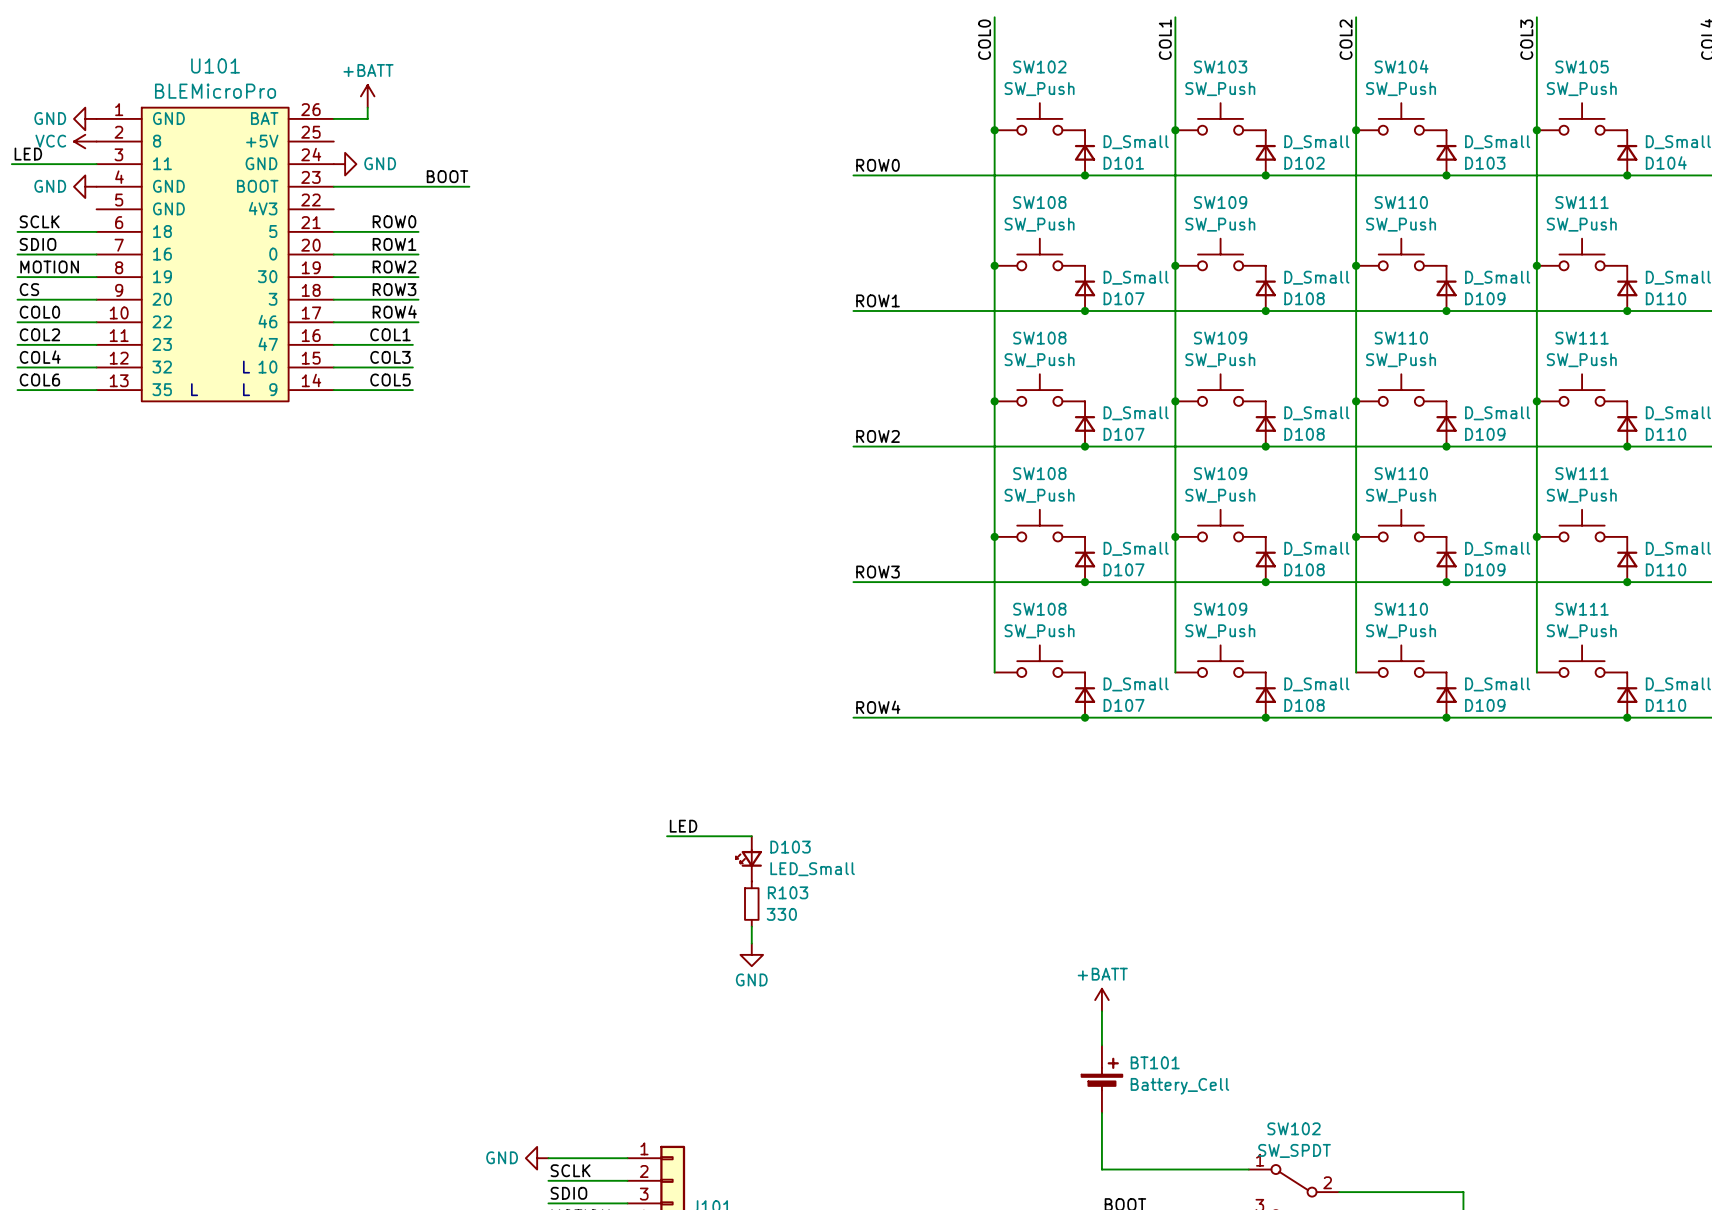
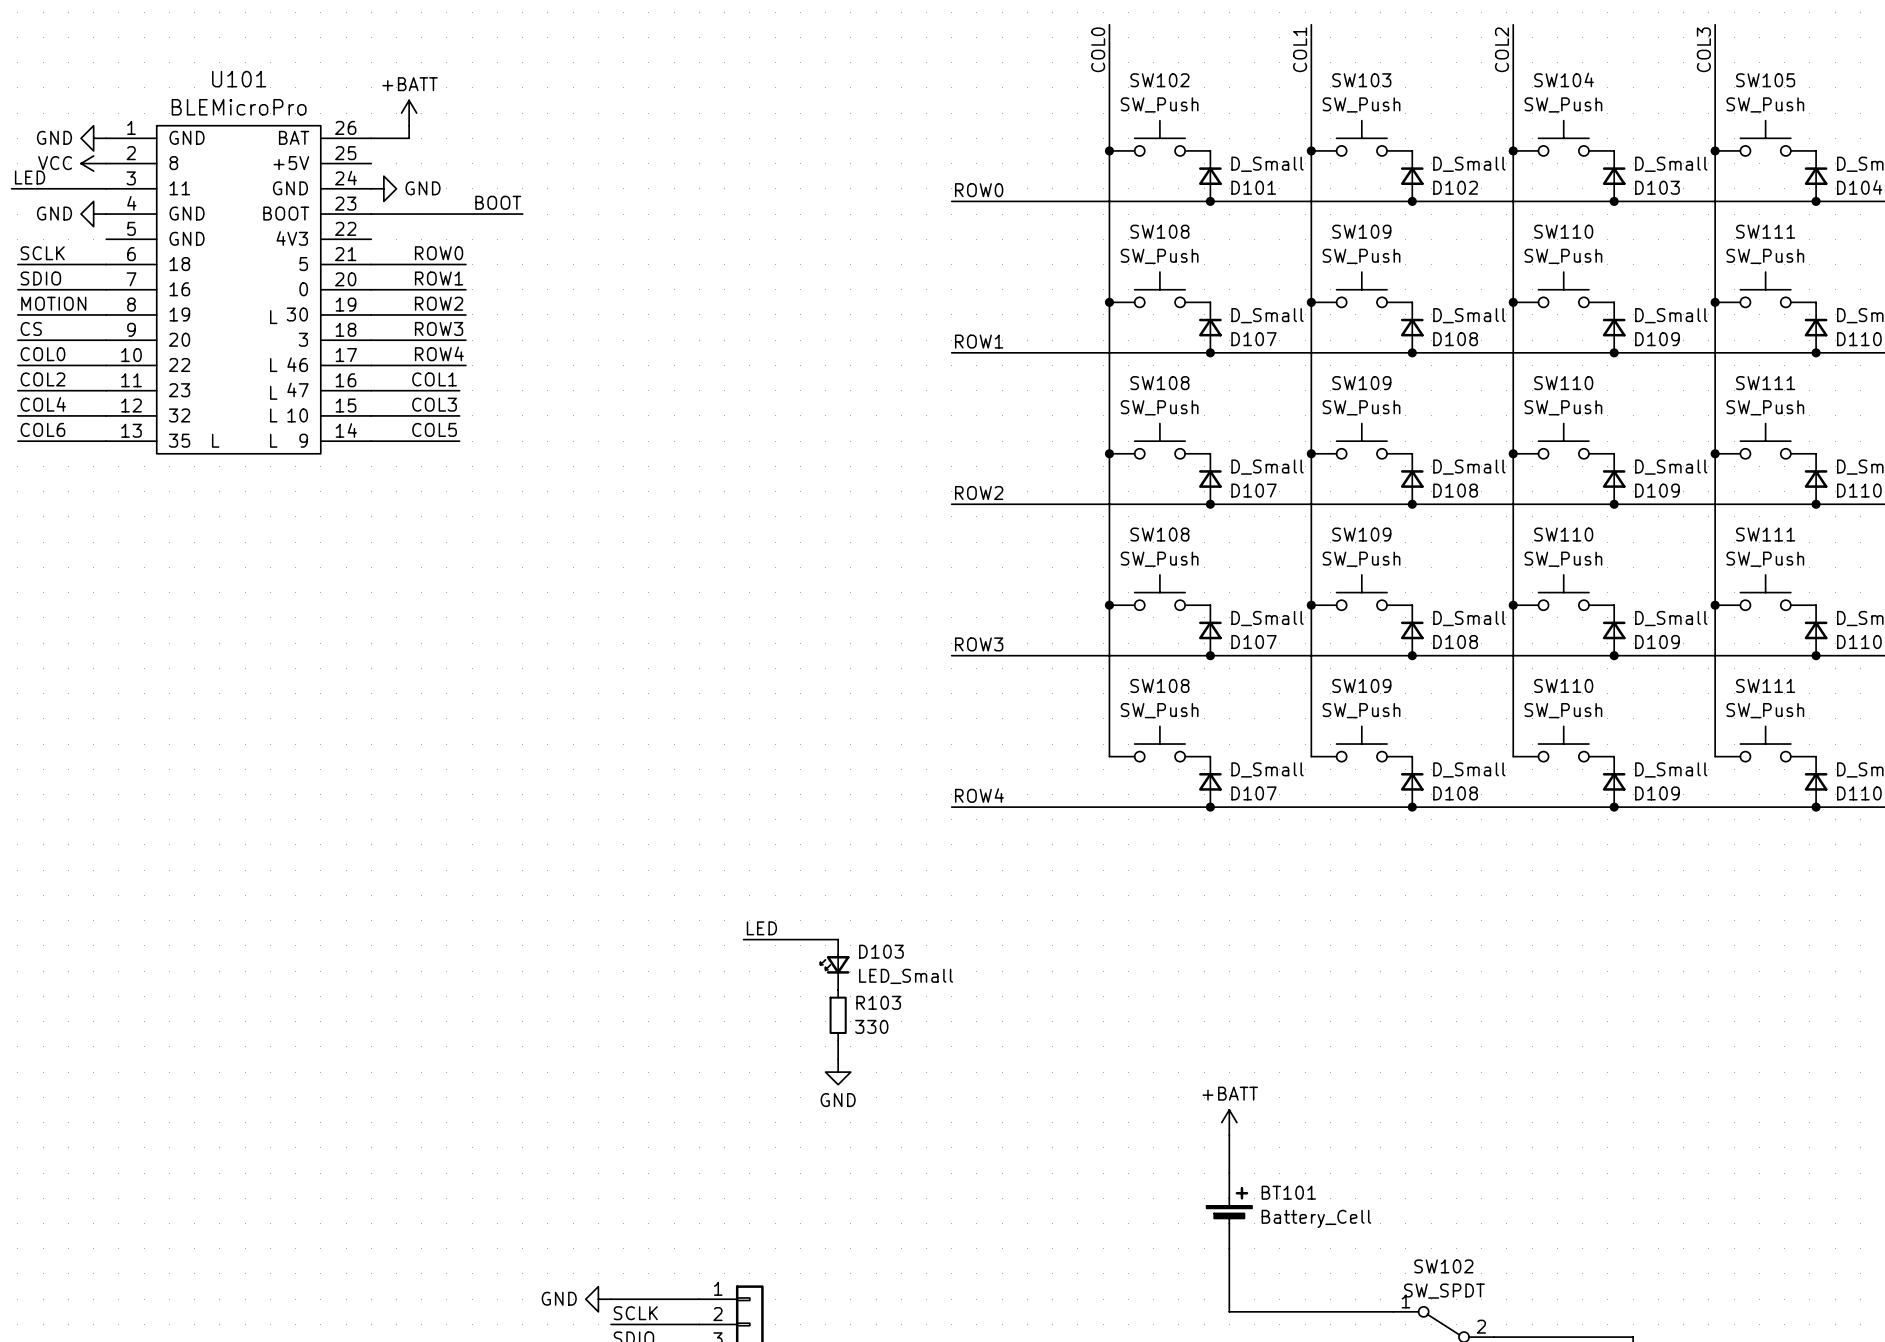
text: none -> L (273, 317)
text: none -> L (273, 365)
text: none -> L (273, 392)

